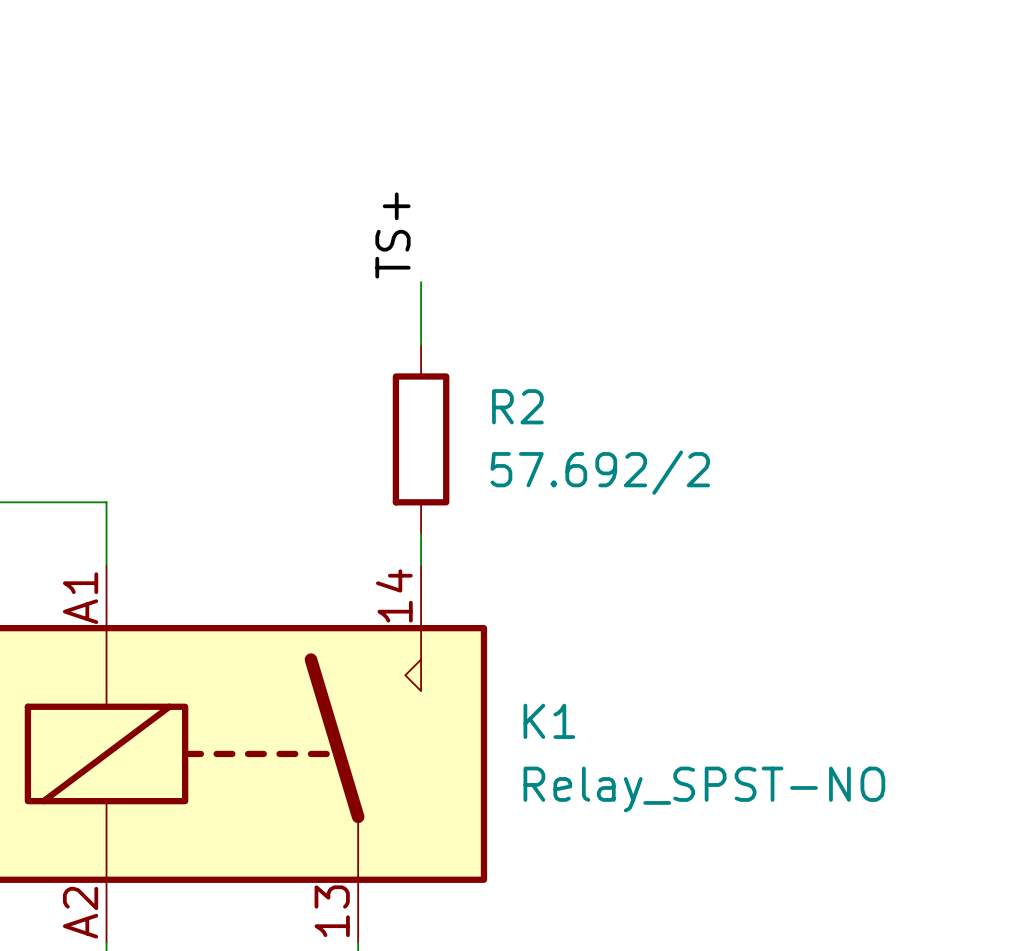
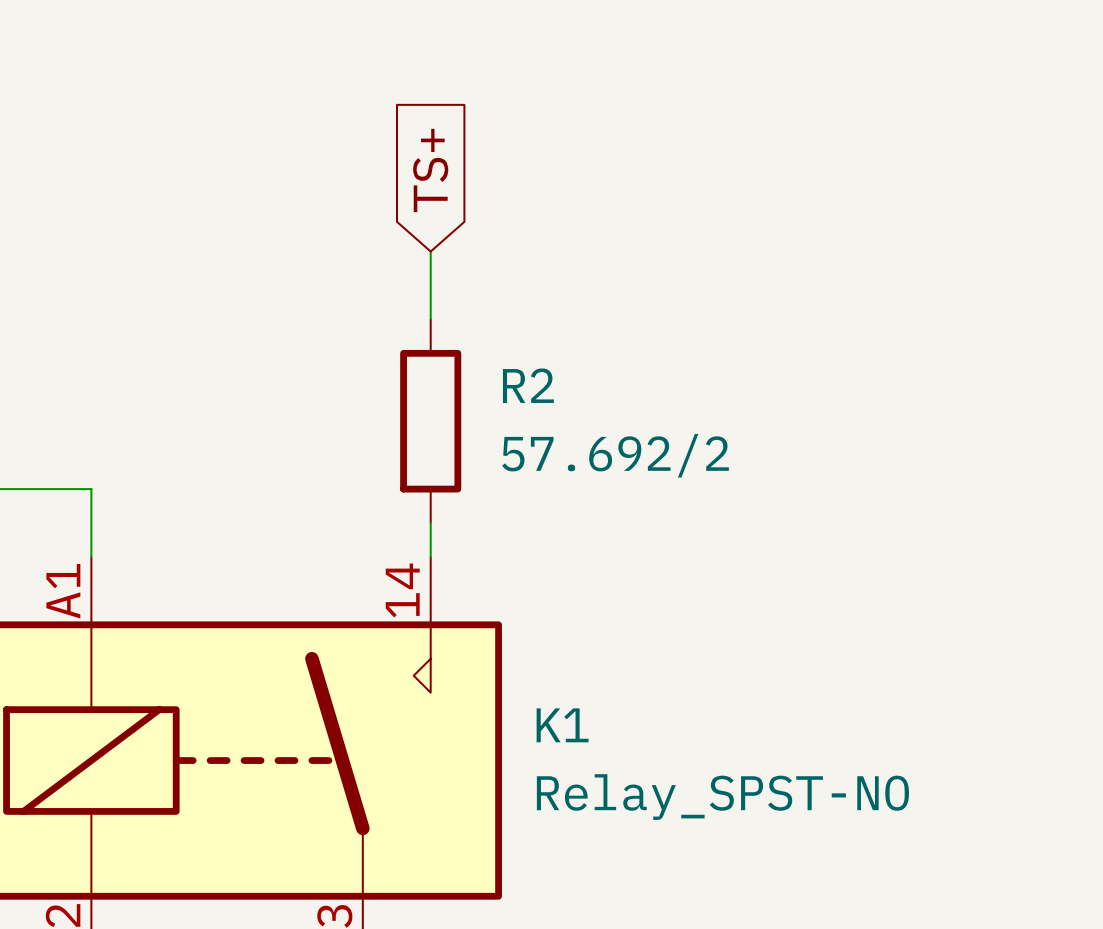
global label: none -> TS+ (430, 170)
label: TS+ (392, 235) -> none

